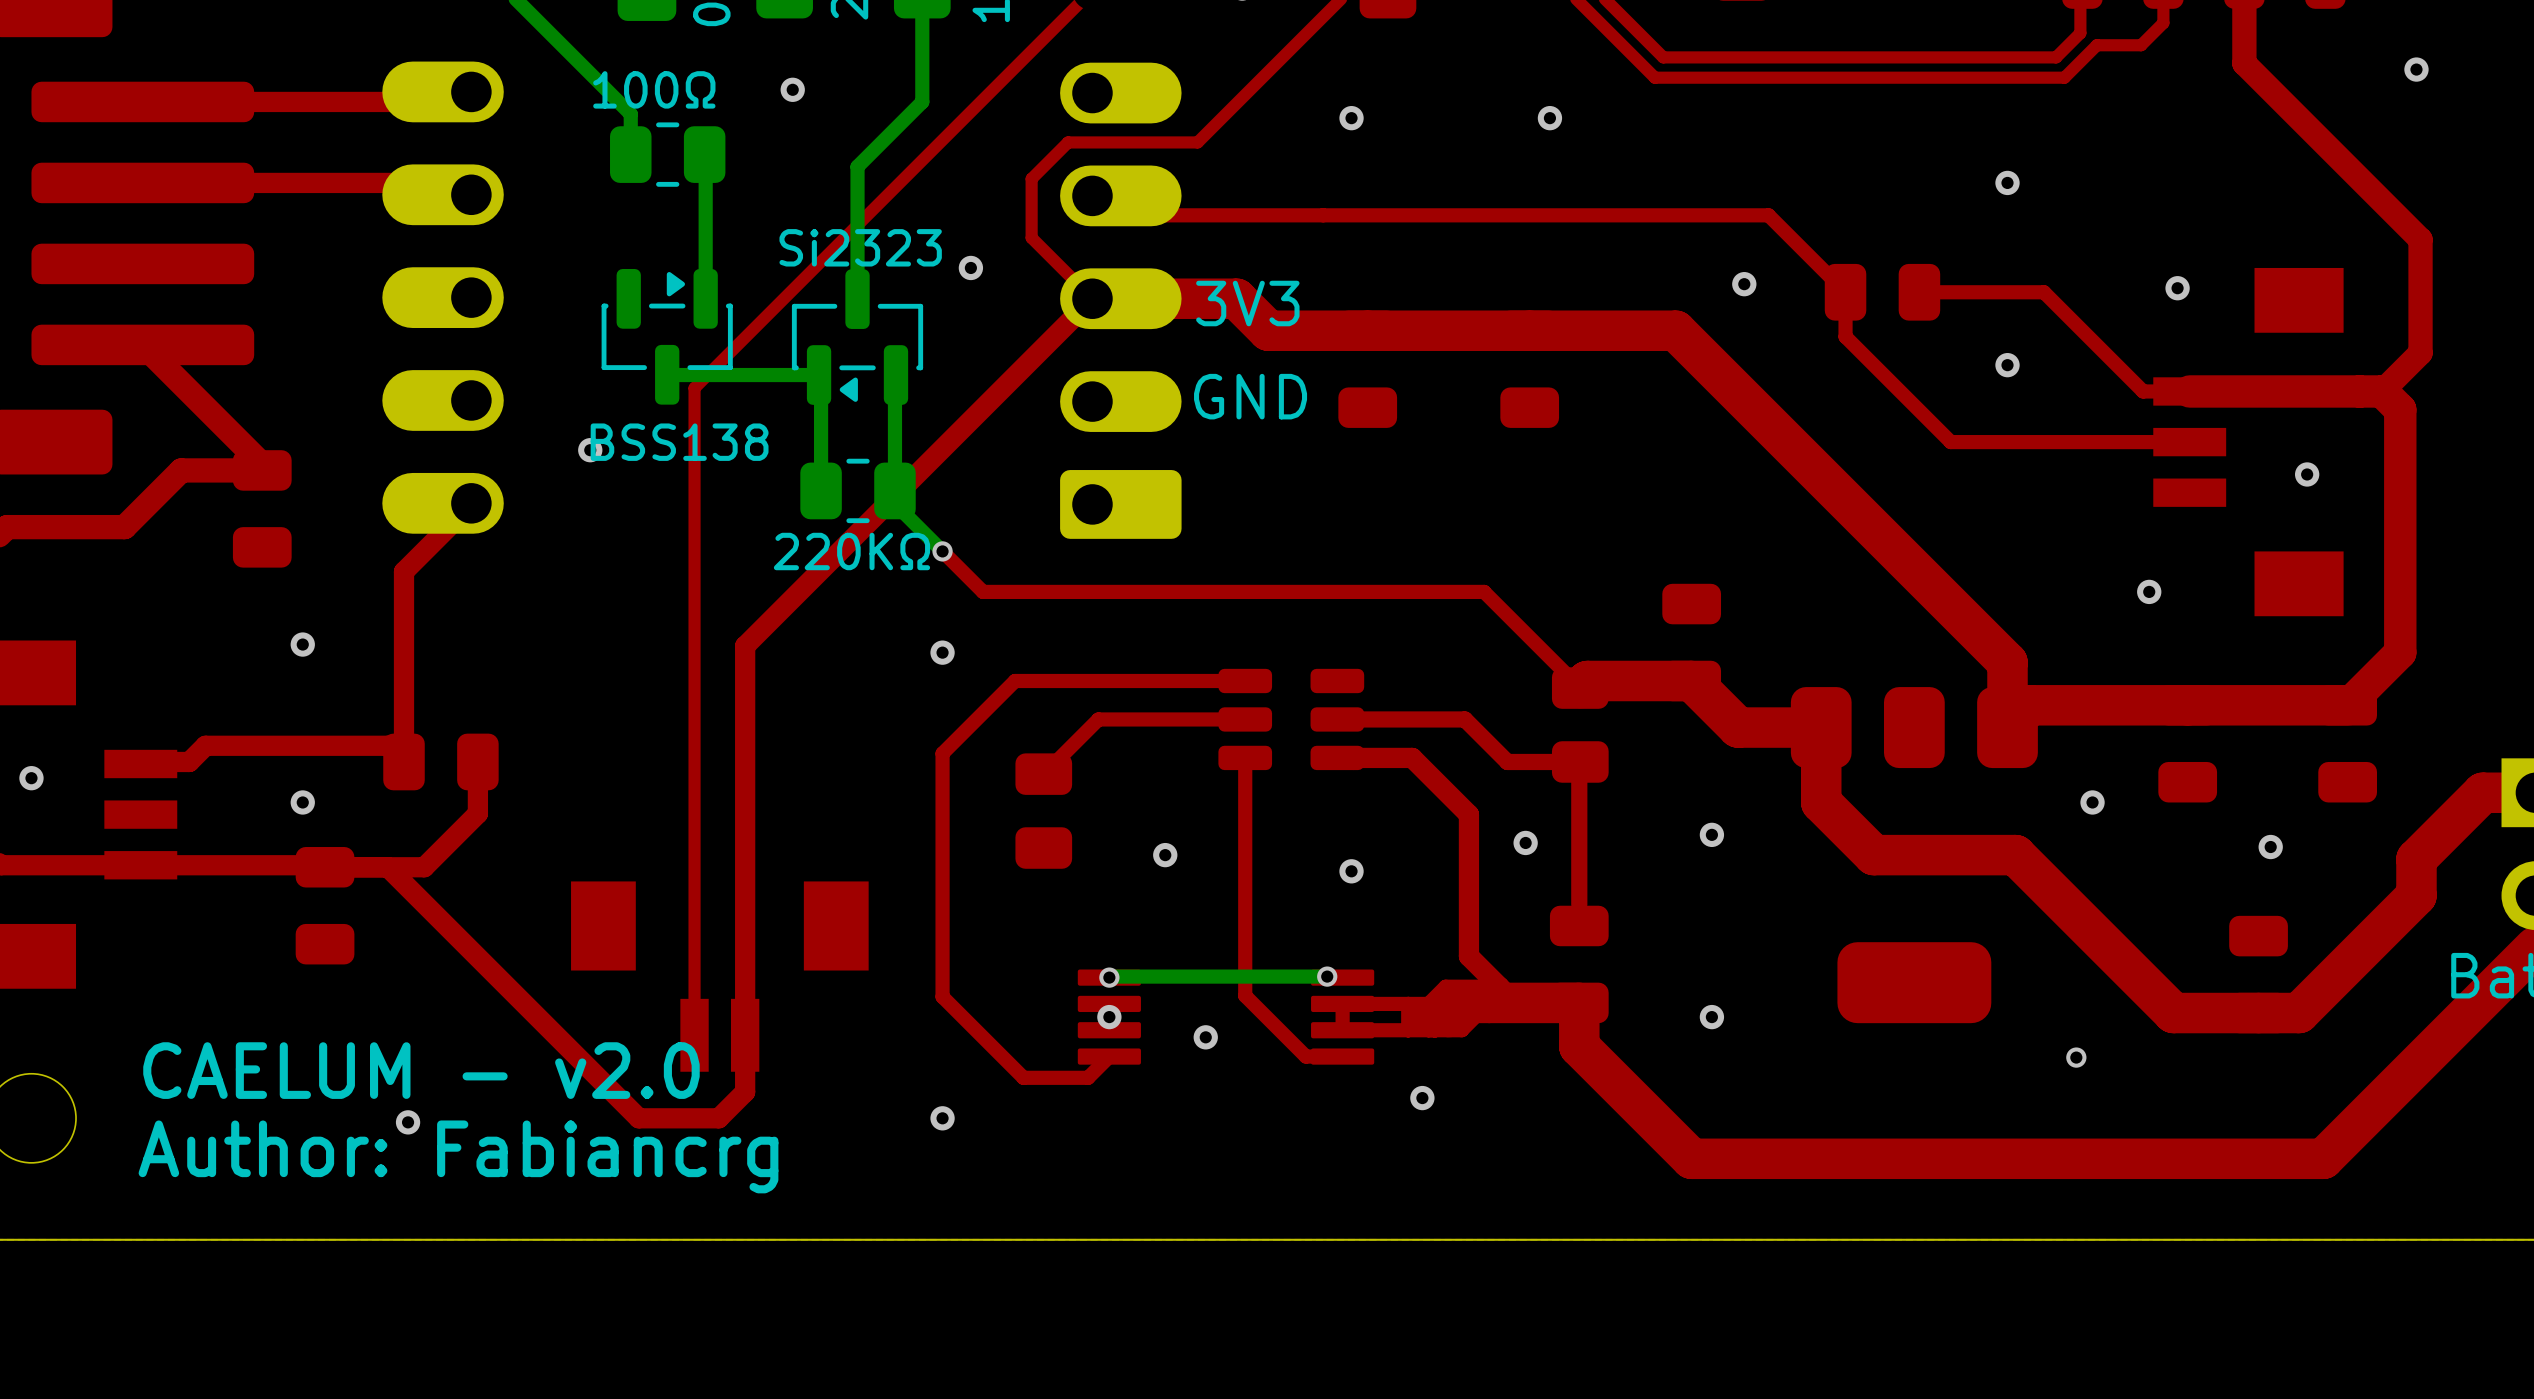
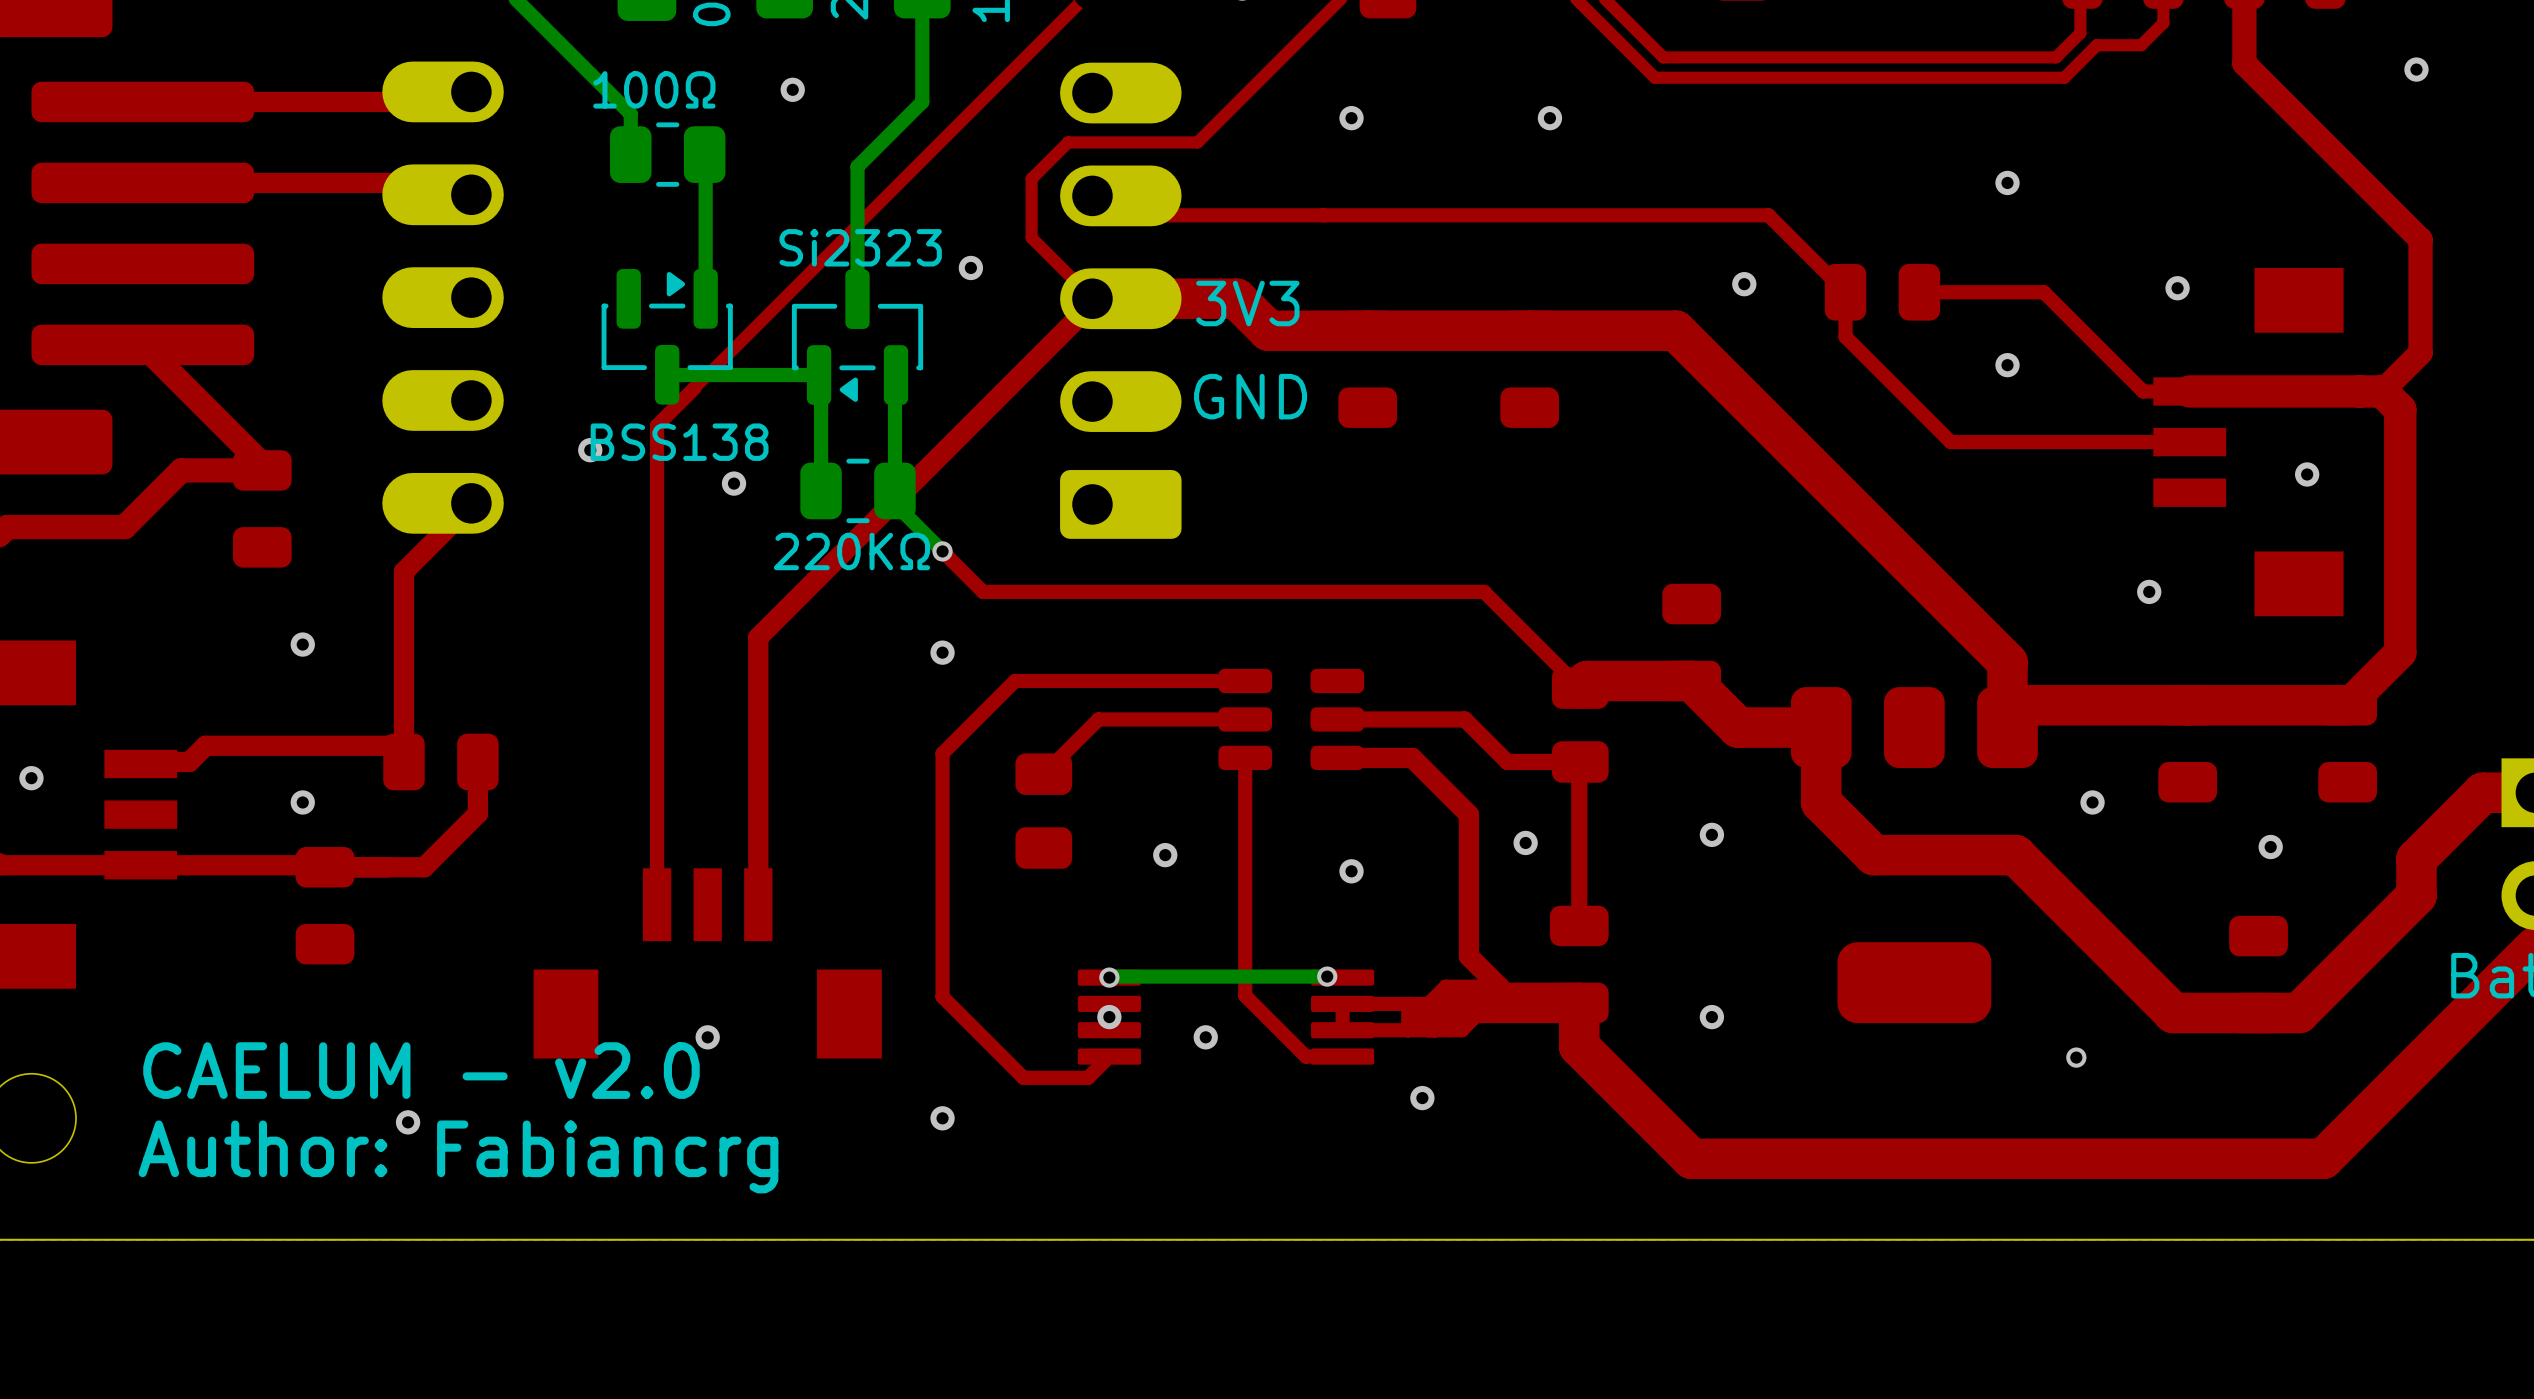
top track: (1092, 298) (745, 646) (745, 1091) (718, 1118) (638, 1118) (387, 867) -> (1092, 298) (1092, 303) (758, 637) (758, 904)
top track: (694, 388) (694, 1035) -> (694, 388) (657, 425) (657, 904)
via: none -> (734, 483)
part footprint: [571, 881, 869, 1072] -> [533, 868, 882, 1059]
via: none -> (707, 1037)

